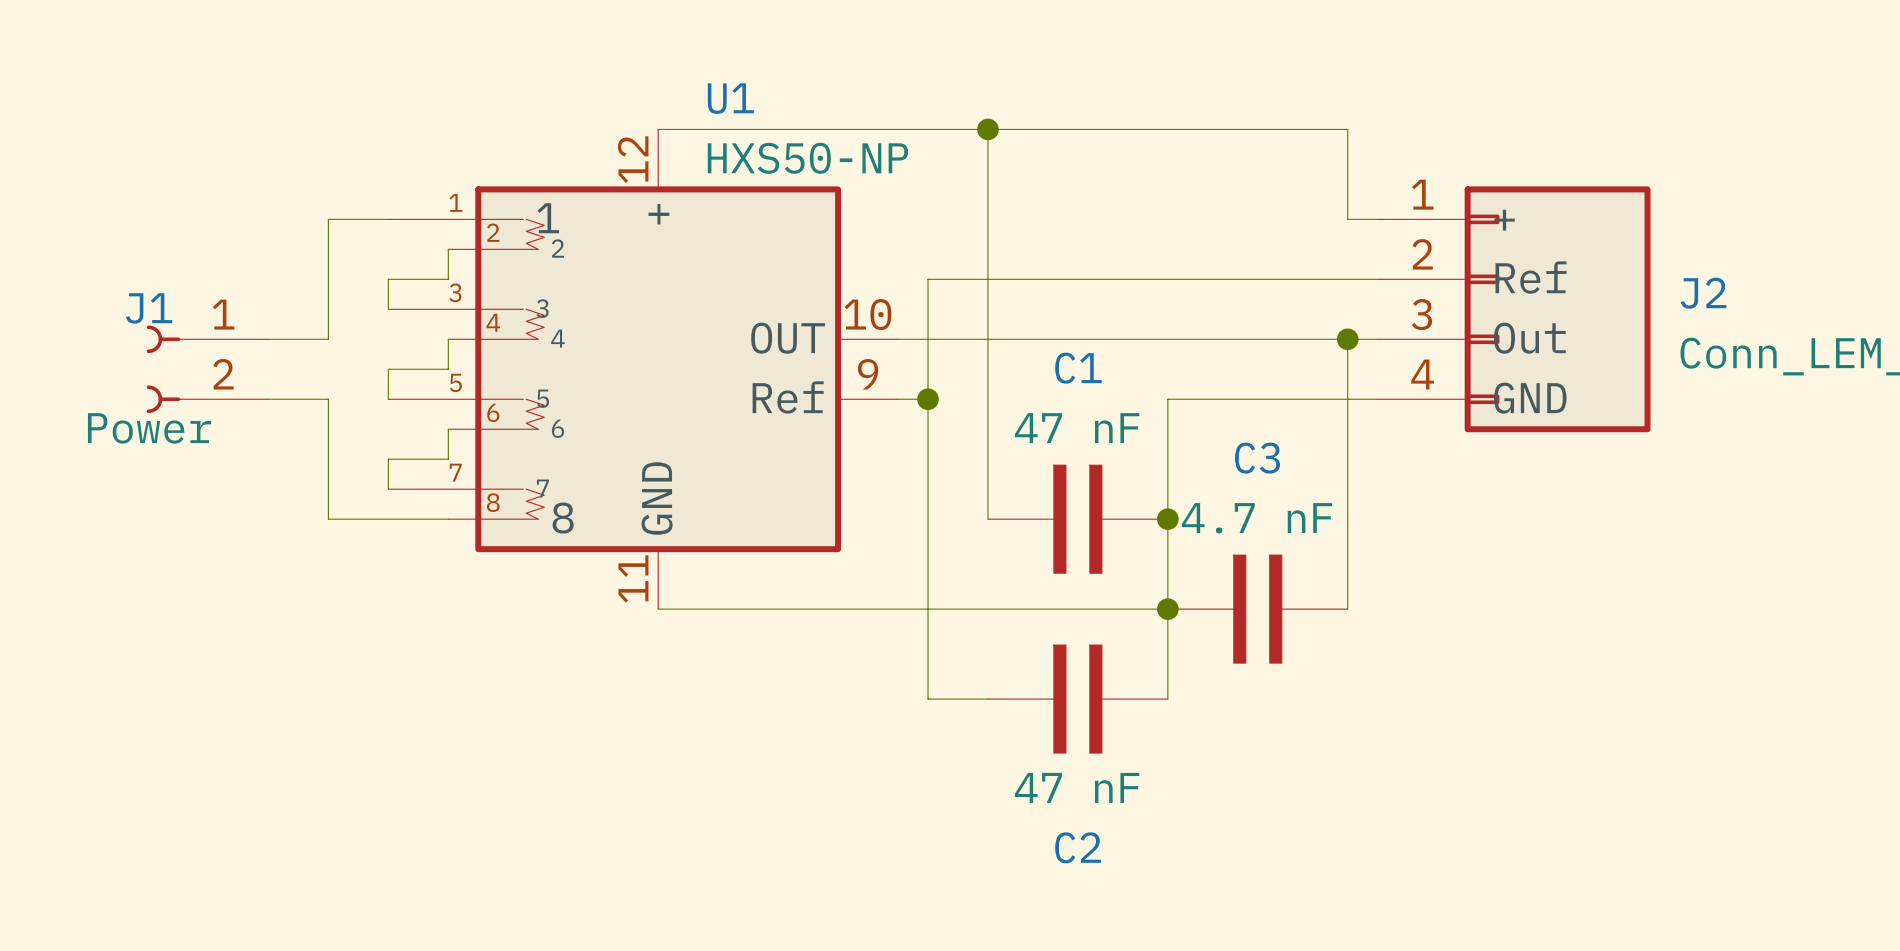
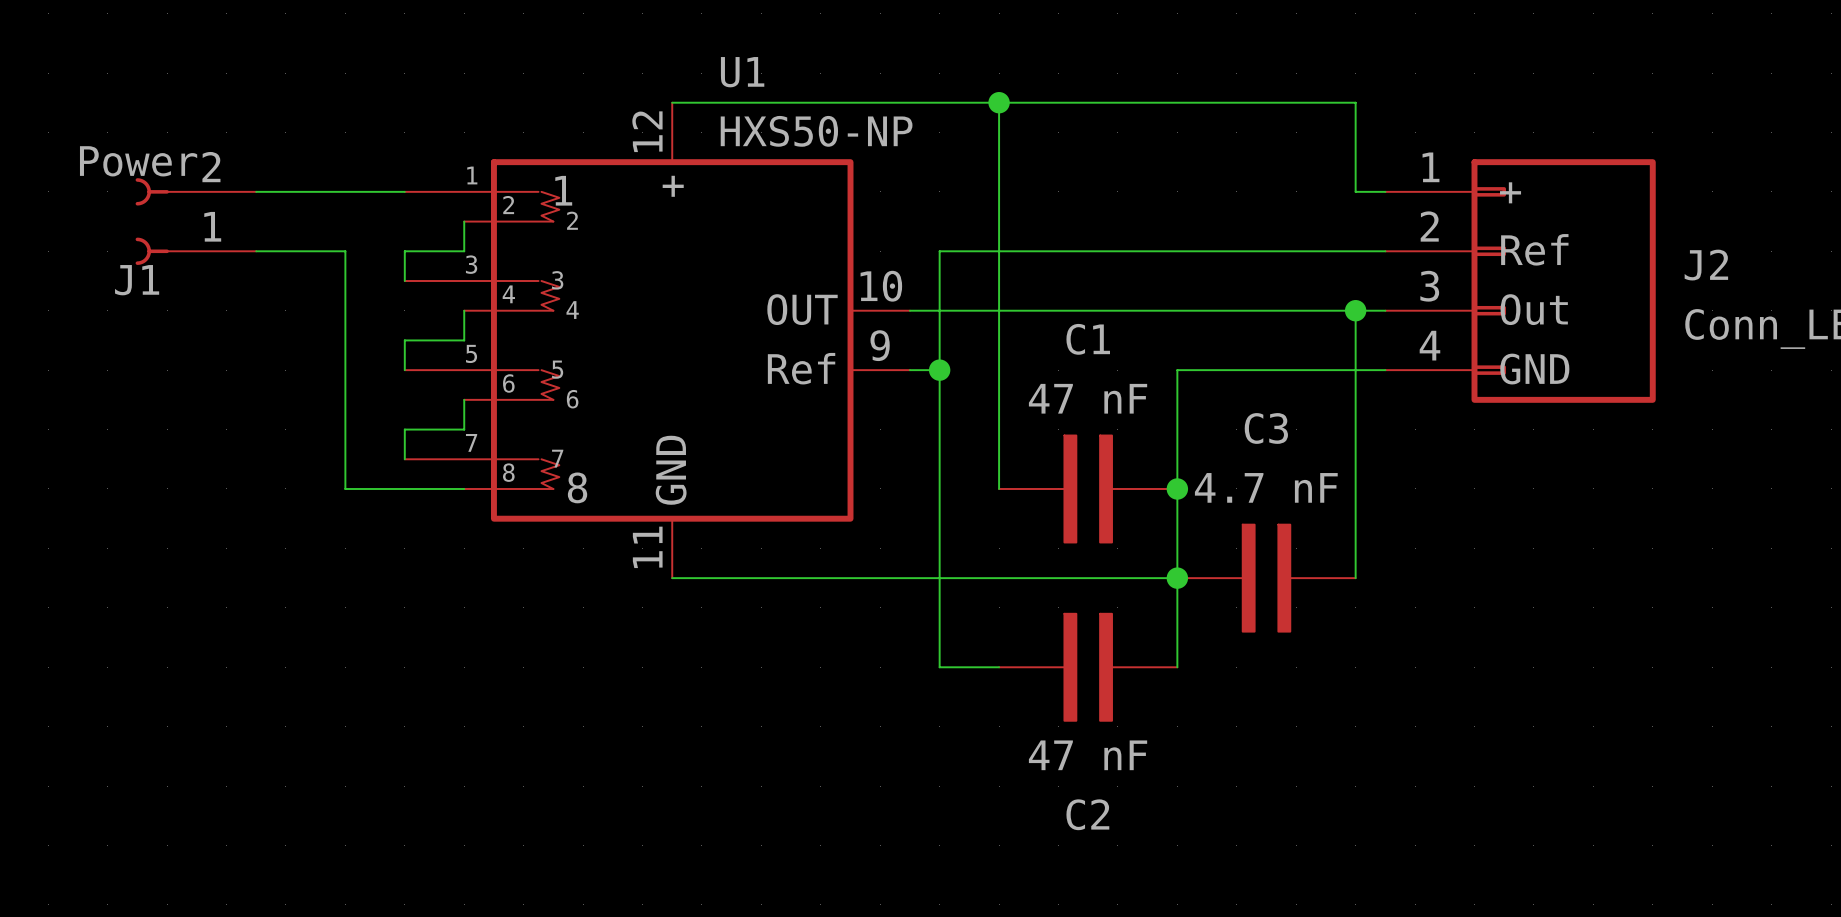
wire: (328, 219) (328, 279) -> (345, 191) (256, 191)
wire: none -> (256, 251) (345, 251)
wire: (268, 339) (328, 339) -> (345, 370) (345, 310)
J1 flip: as is (163, 369) -> up-down (152, 221)
J1 position: (207, 369) -> (195, 221)
wire: (268, 399) (328, 399) -> none

